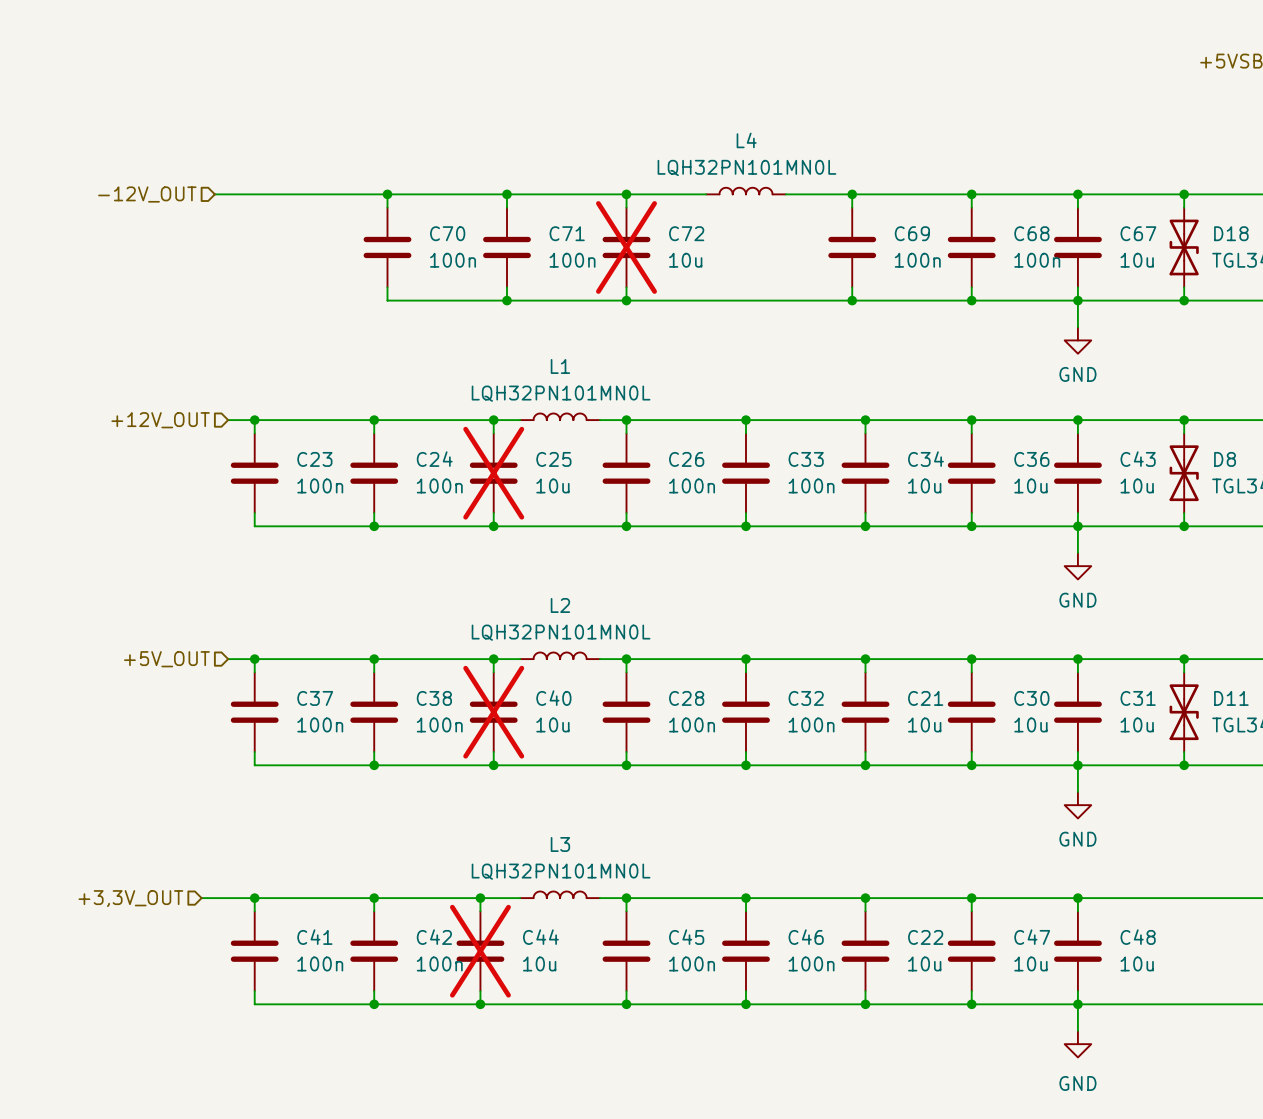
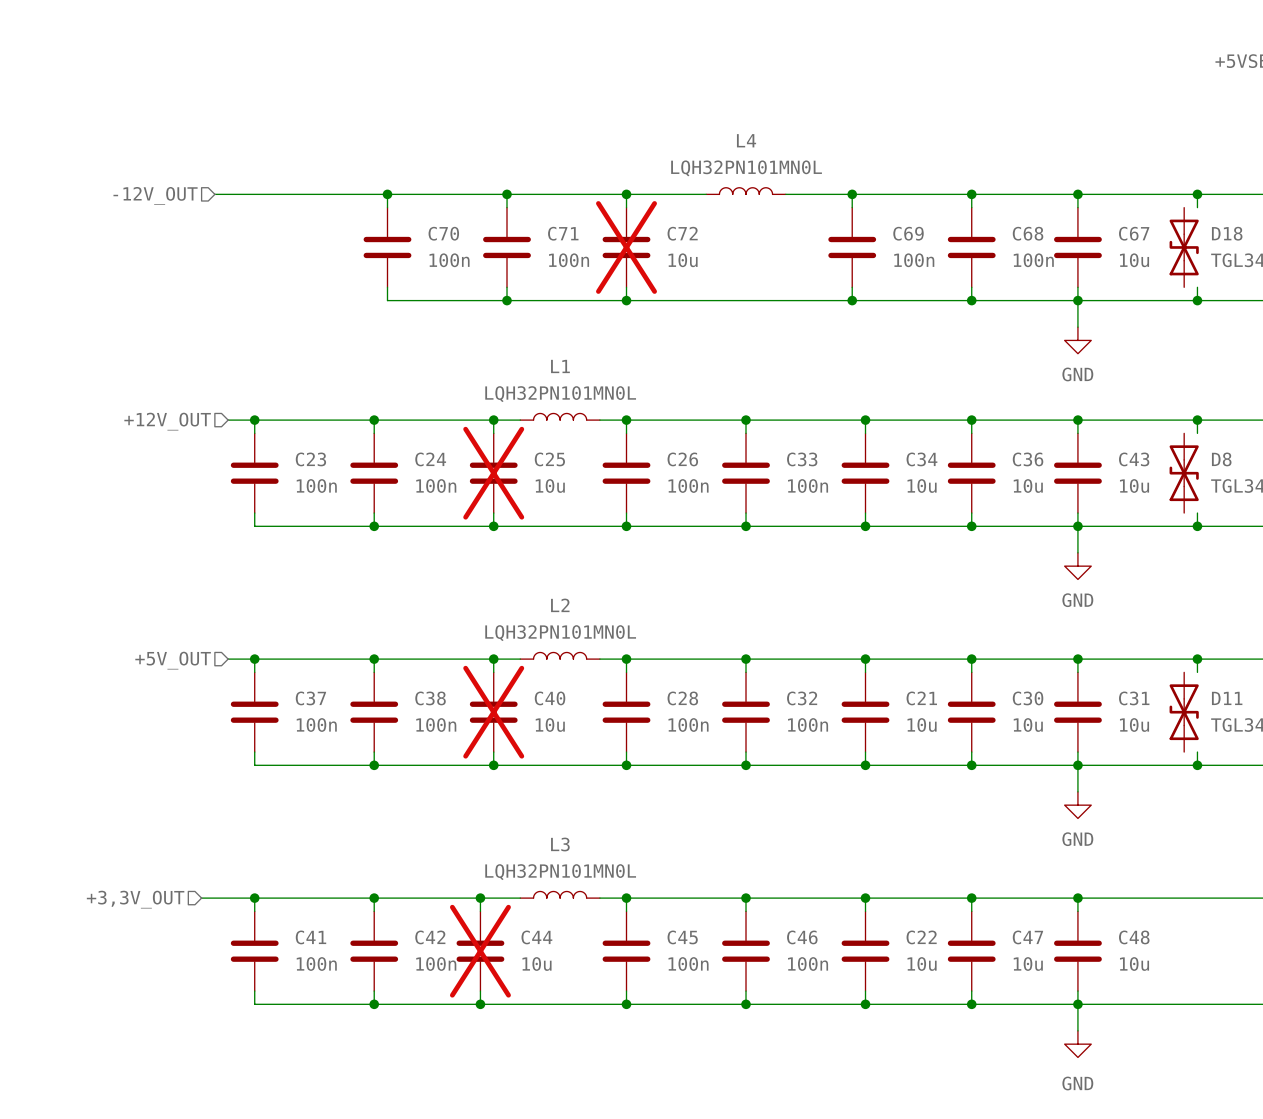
wire: (1184, 194) (1184, 207) -> (1197, 194) (1197, 207)
junction position: (1184, 194) -> (1197, 194)
wire: (1184, 287) (1184, 300) -> (1197, 287) (1197, 300)
junction position: (1184, 300) -> (1197, 300)
wire: (1184, 420) (1184, 433) -> (1197, 420) (1197, 433)
junction position: (1184, 420) -> (1197, 420)
wire: (1184, 513) (1184, 526) -> (1197, 513) (1197, 526)
junction position: (1184, 526) -> (1197, 526)
wire: (1184, 659) (1184, 672) -> (1197, 659) (1197, 672)
junction position: (1184, 659) -> (1197, 659)
wire: (1184, 752) (1184, 765) -> (1197, 752) (1197, 765)
junction position: (1184, 765) -> (1197, 765)

